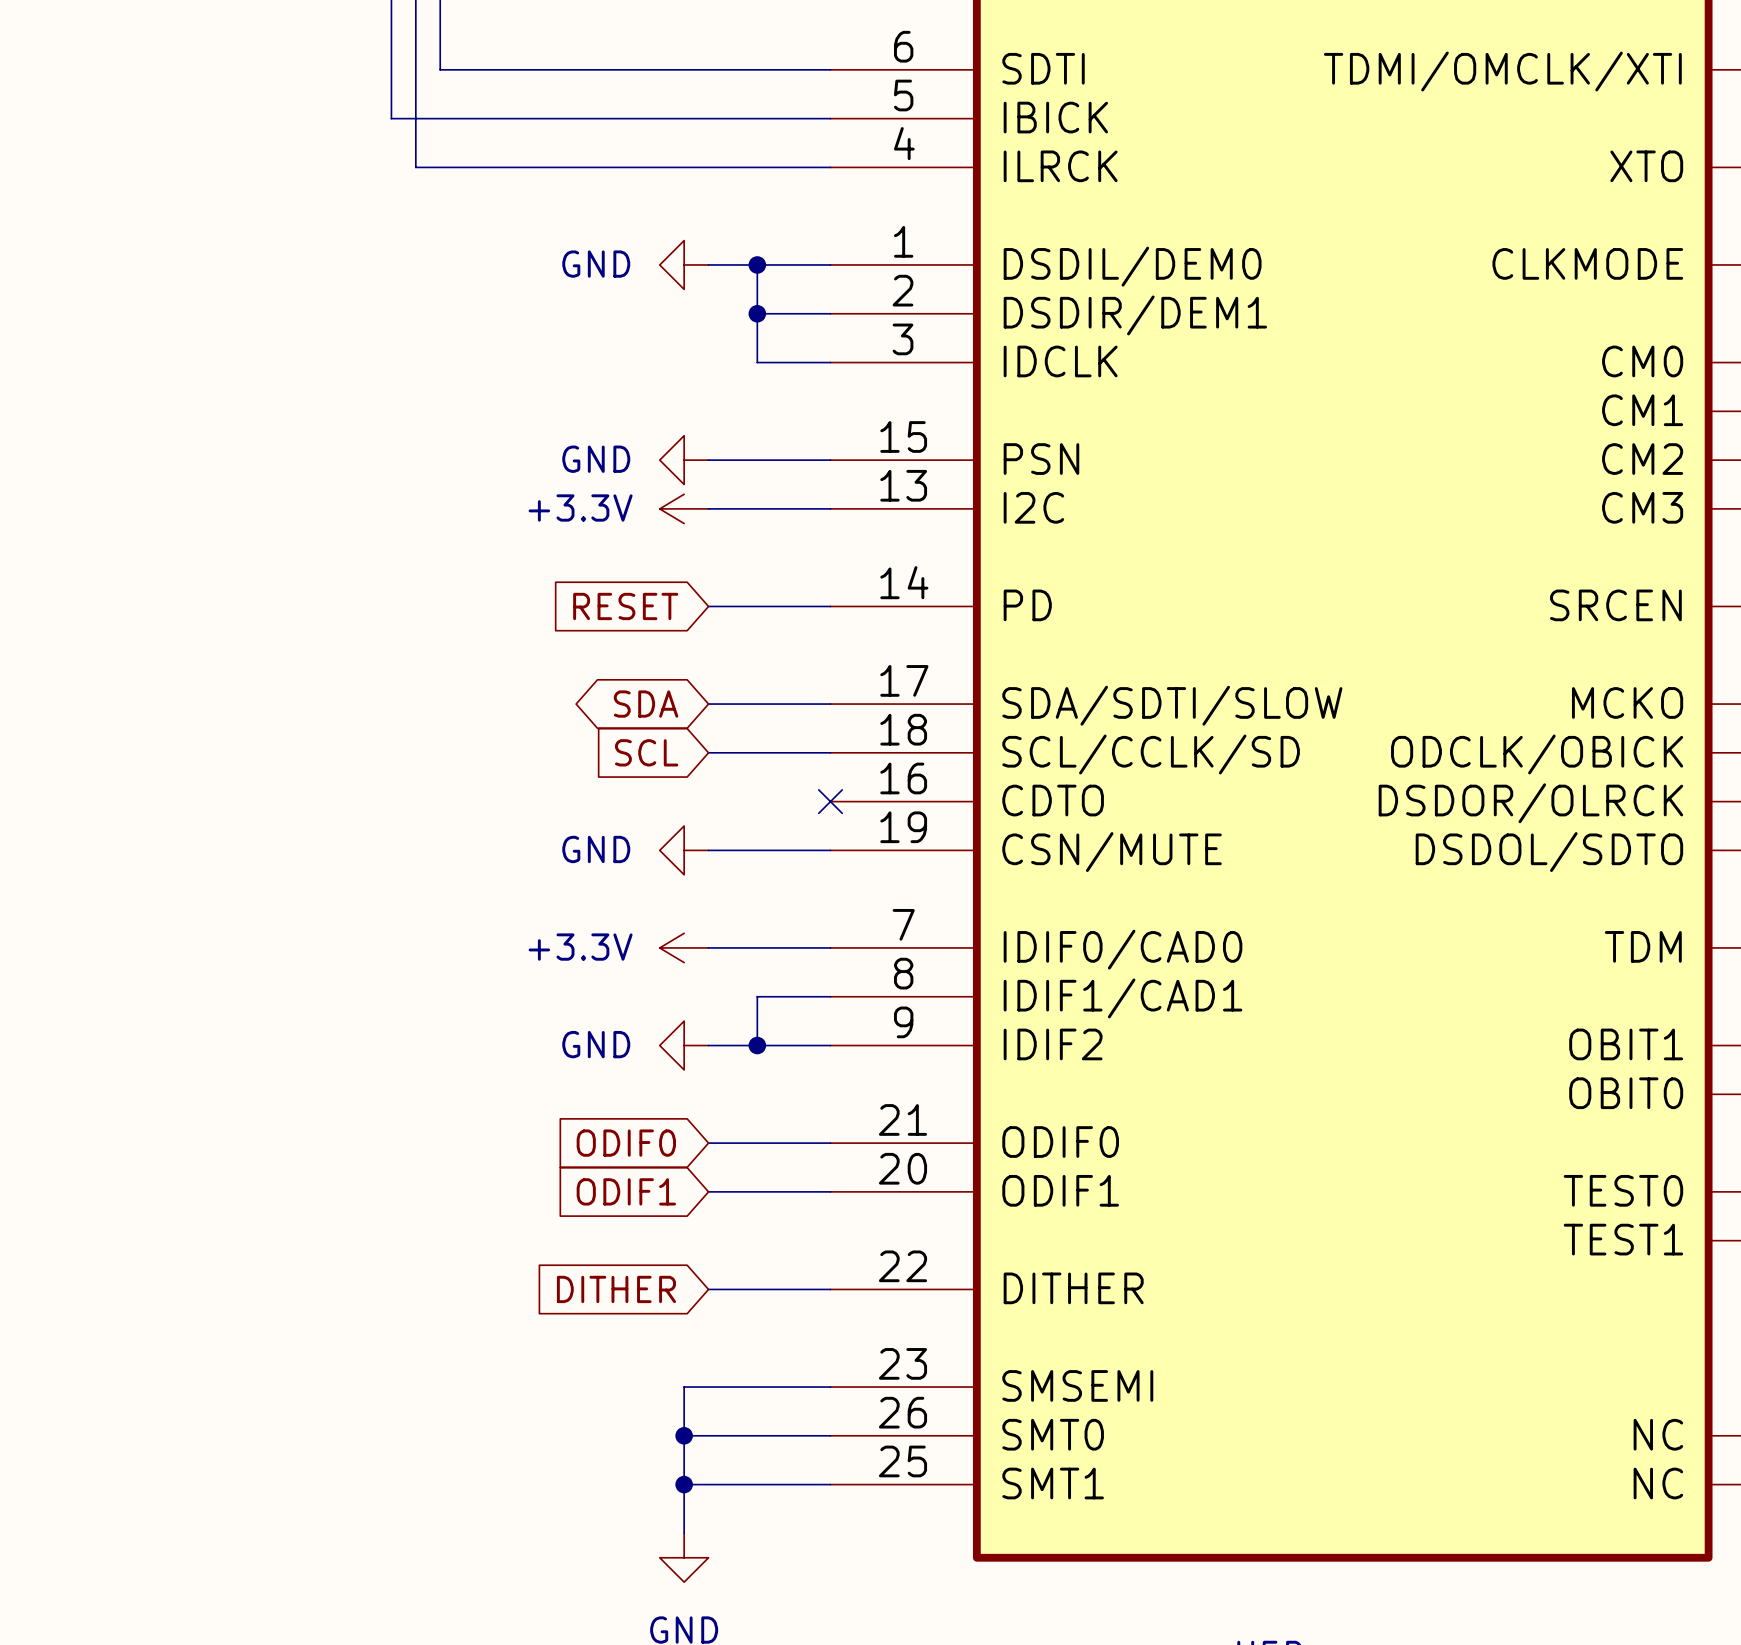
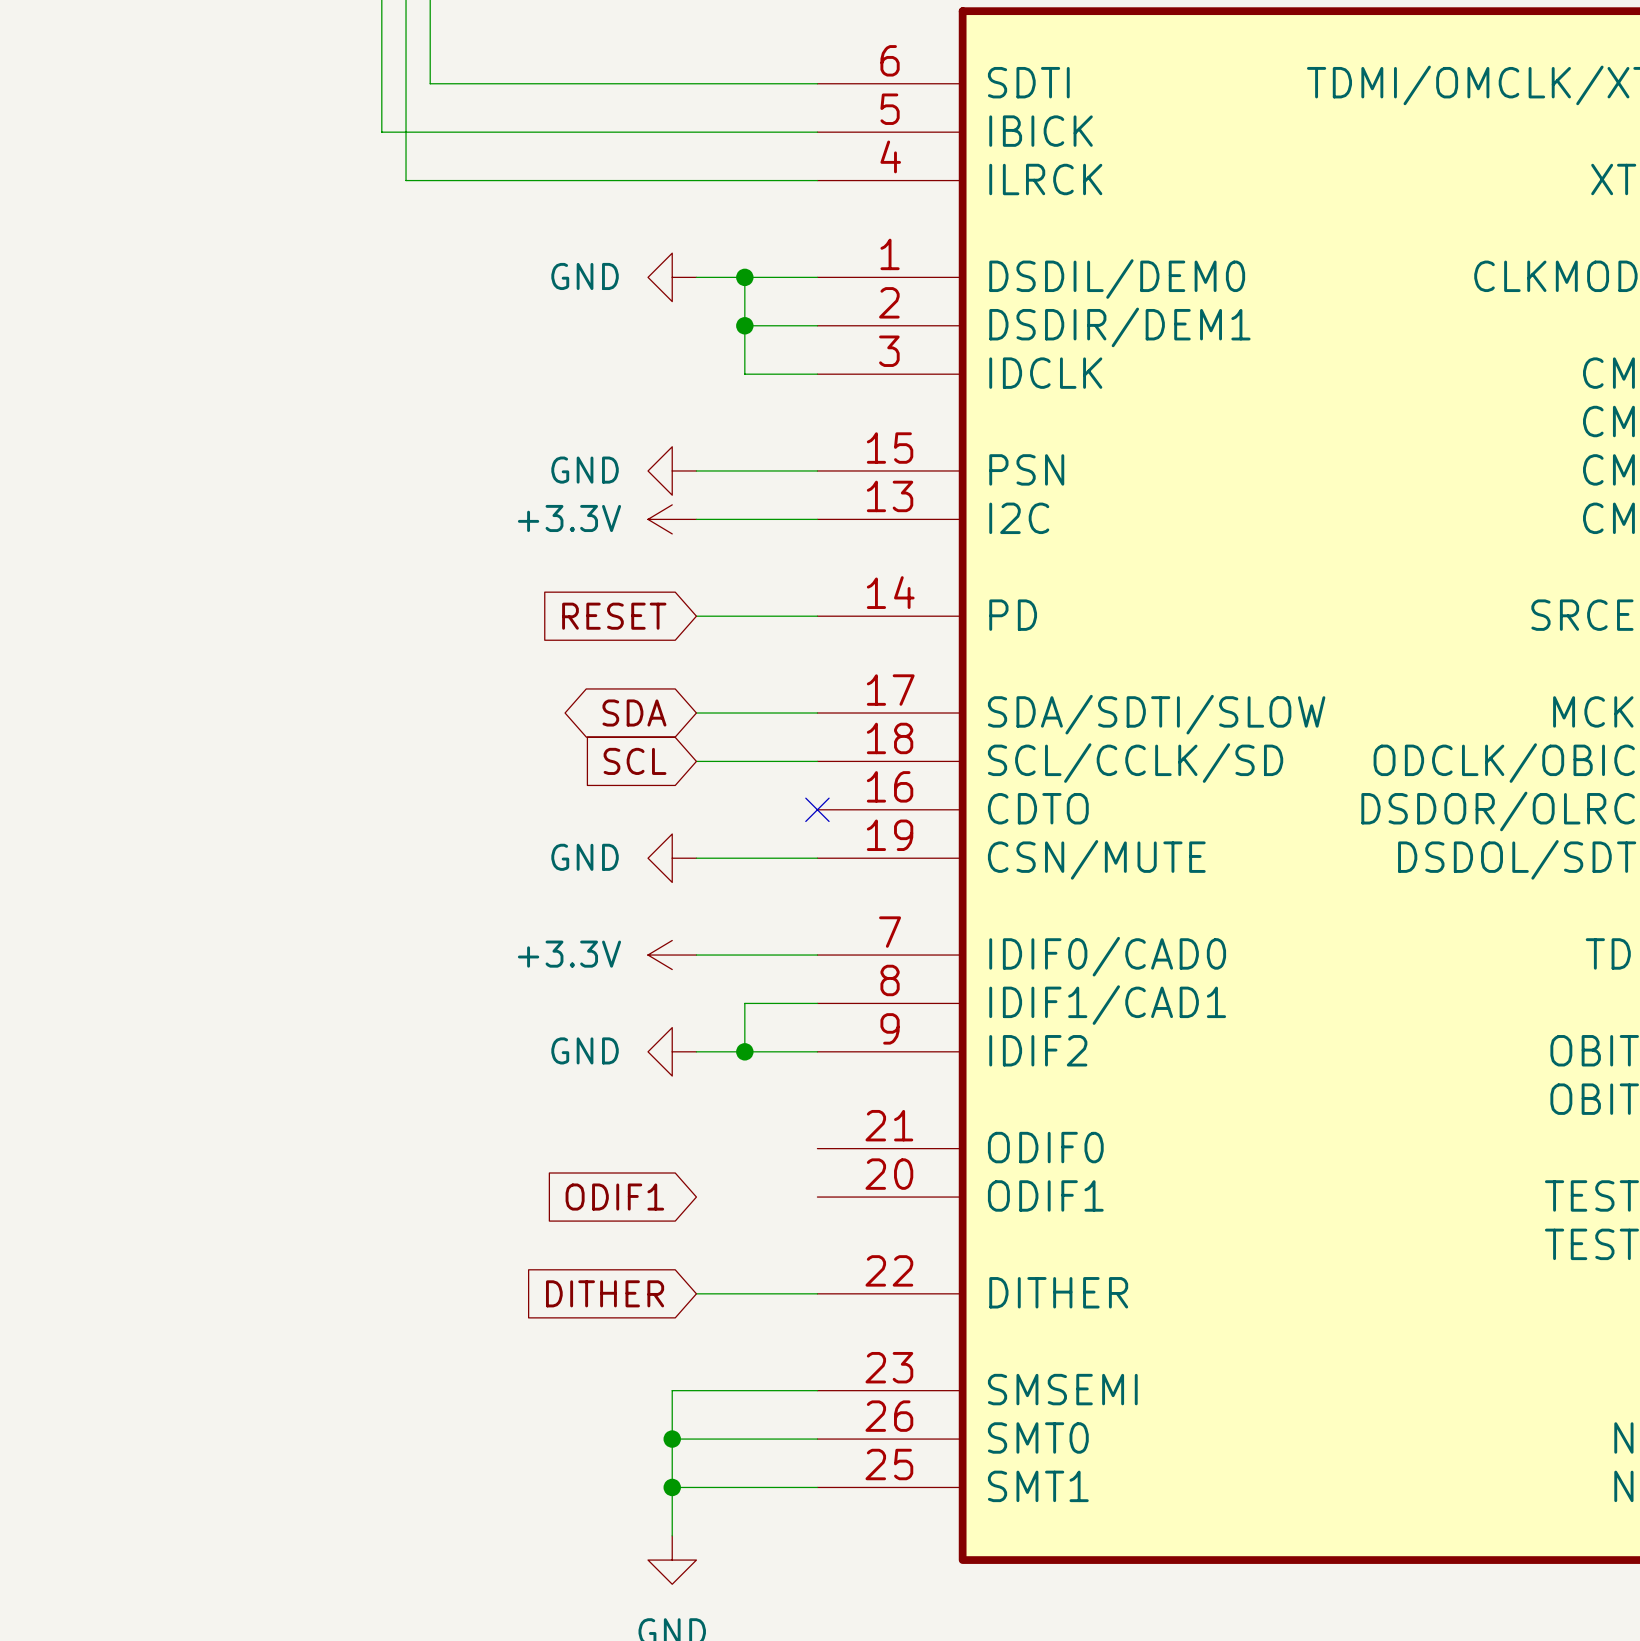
global label: ODIF0 (626, 1143) -> none
wire: (708, 1143) (830, 1143) -> none
wire: (708, 1191) (830, 1191) -> none

